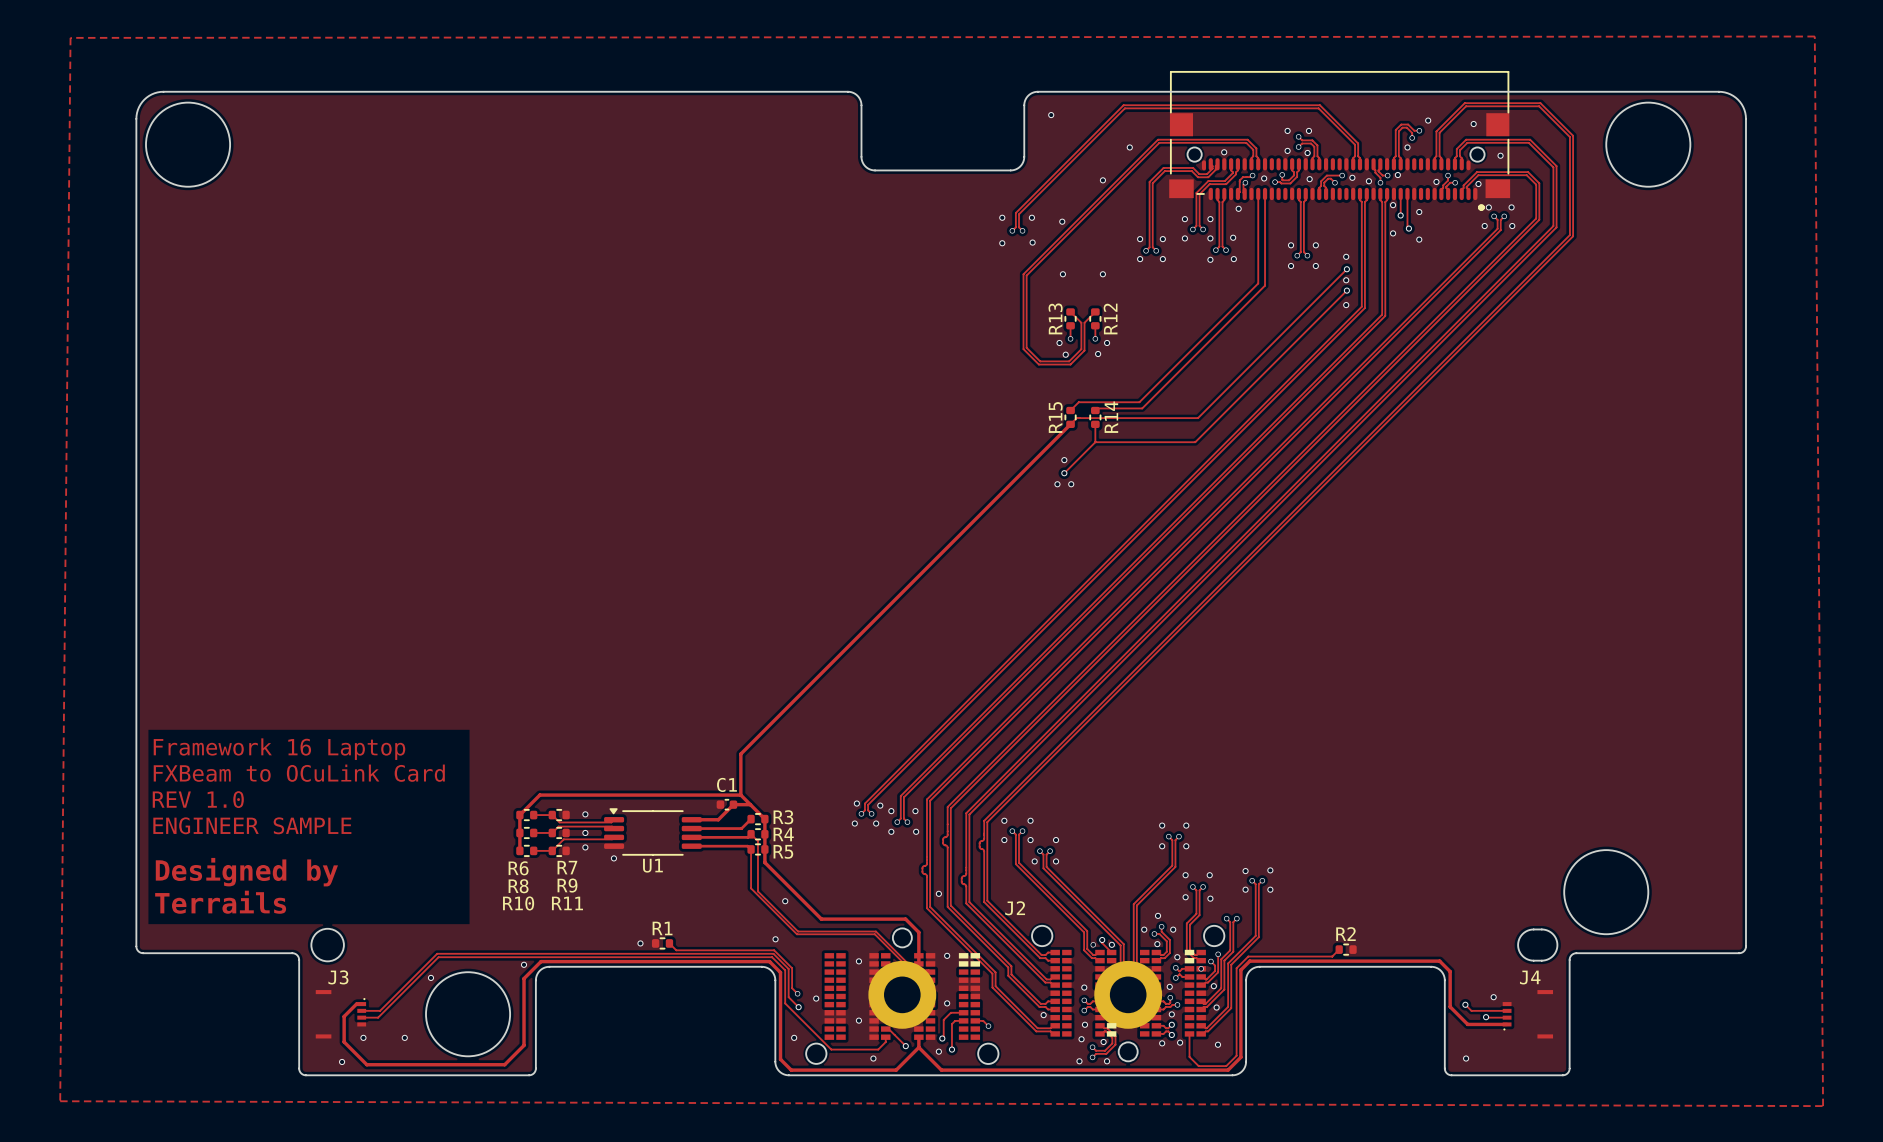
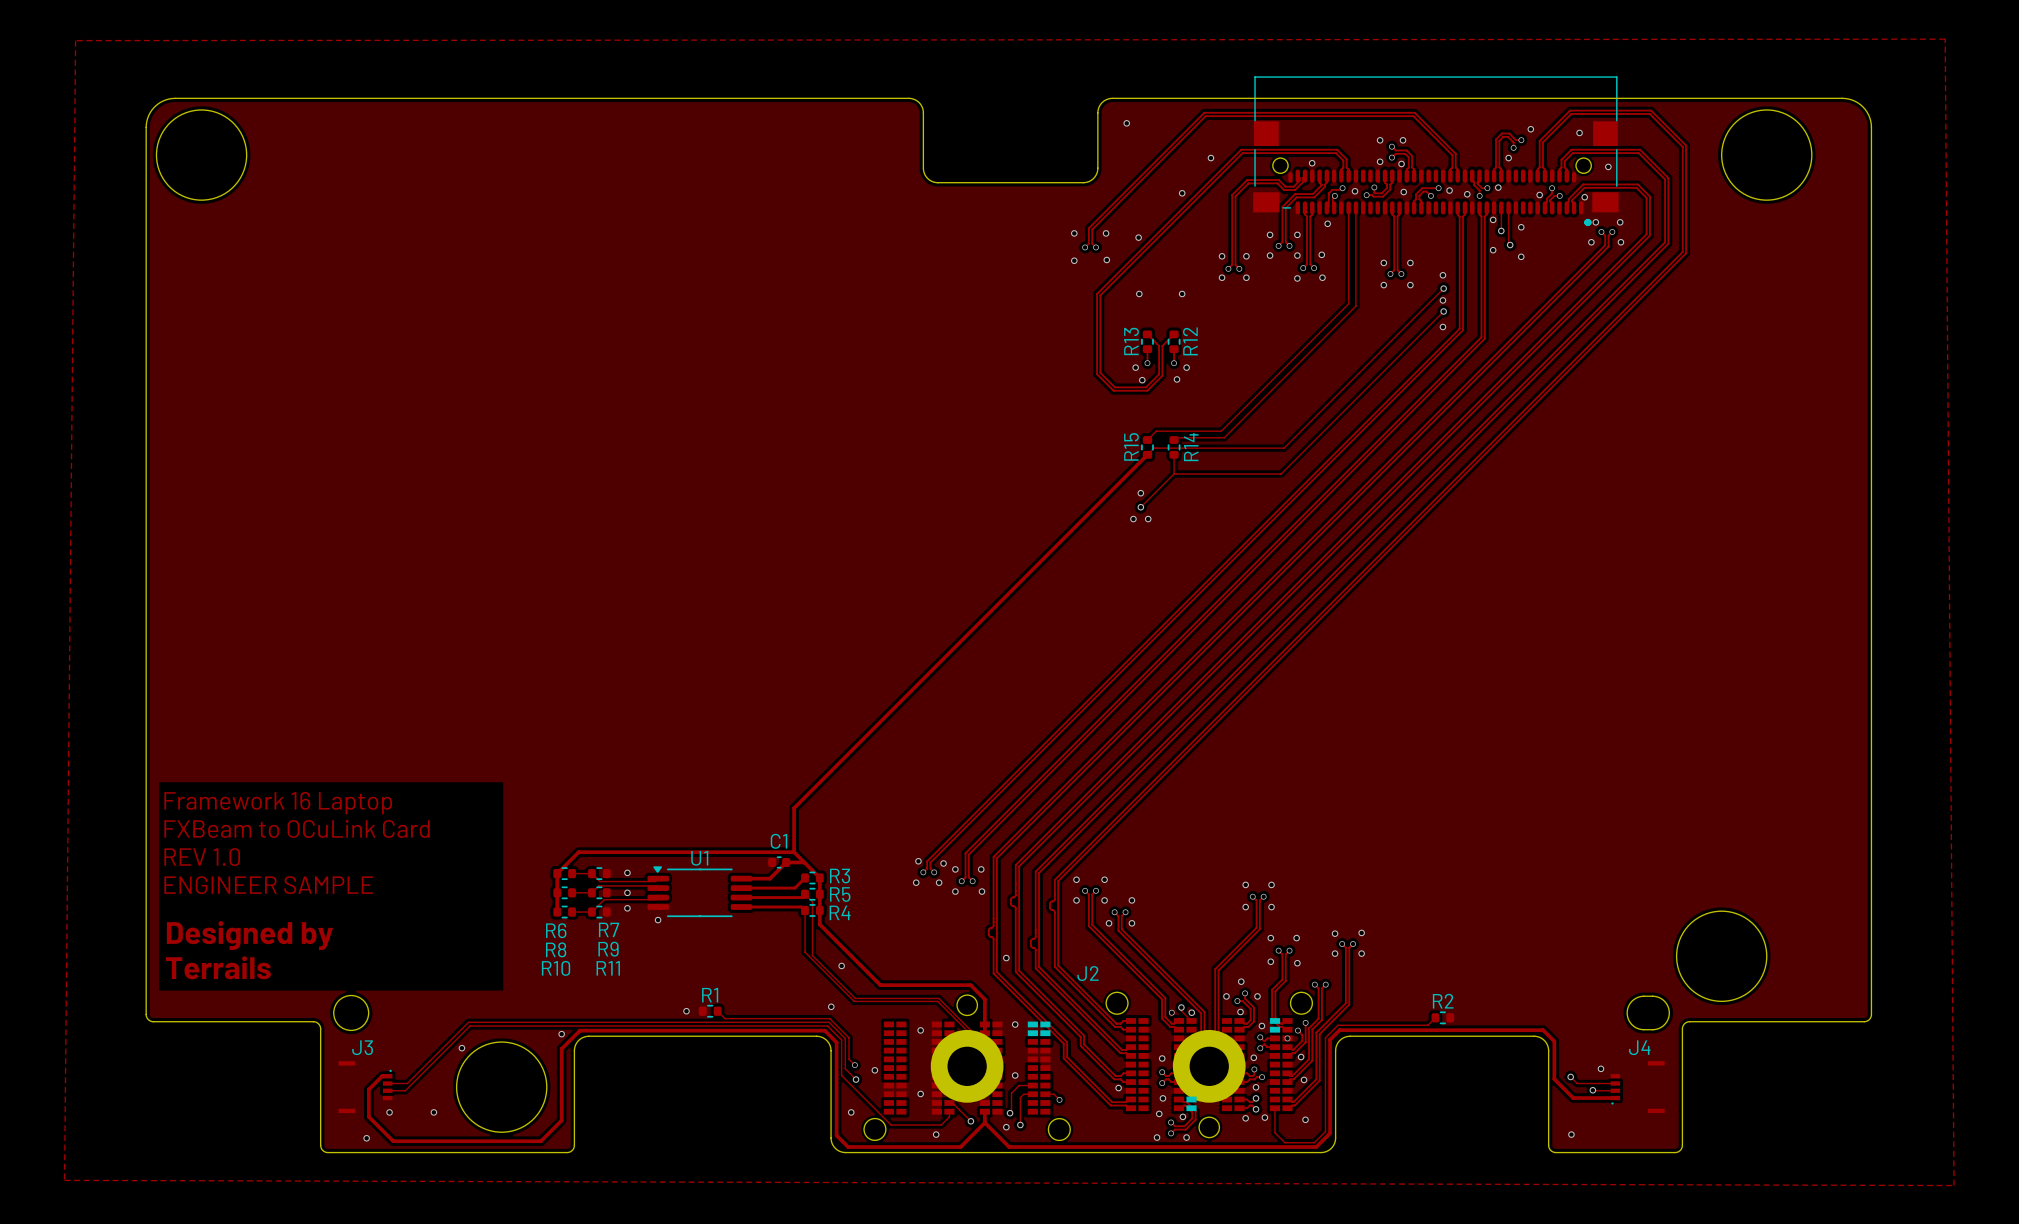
R4 name: R4 (783, 834) -> R5 (840, 894)
R5 name: R5 (783, 851) -> R4 (840, 912)
U1 name position: U1 (652, 865) -> U1 (699, 858)

